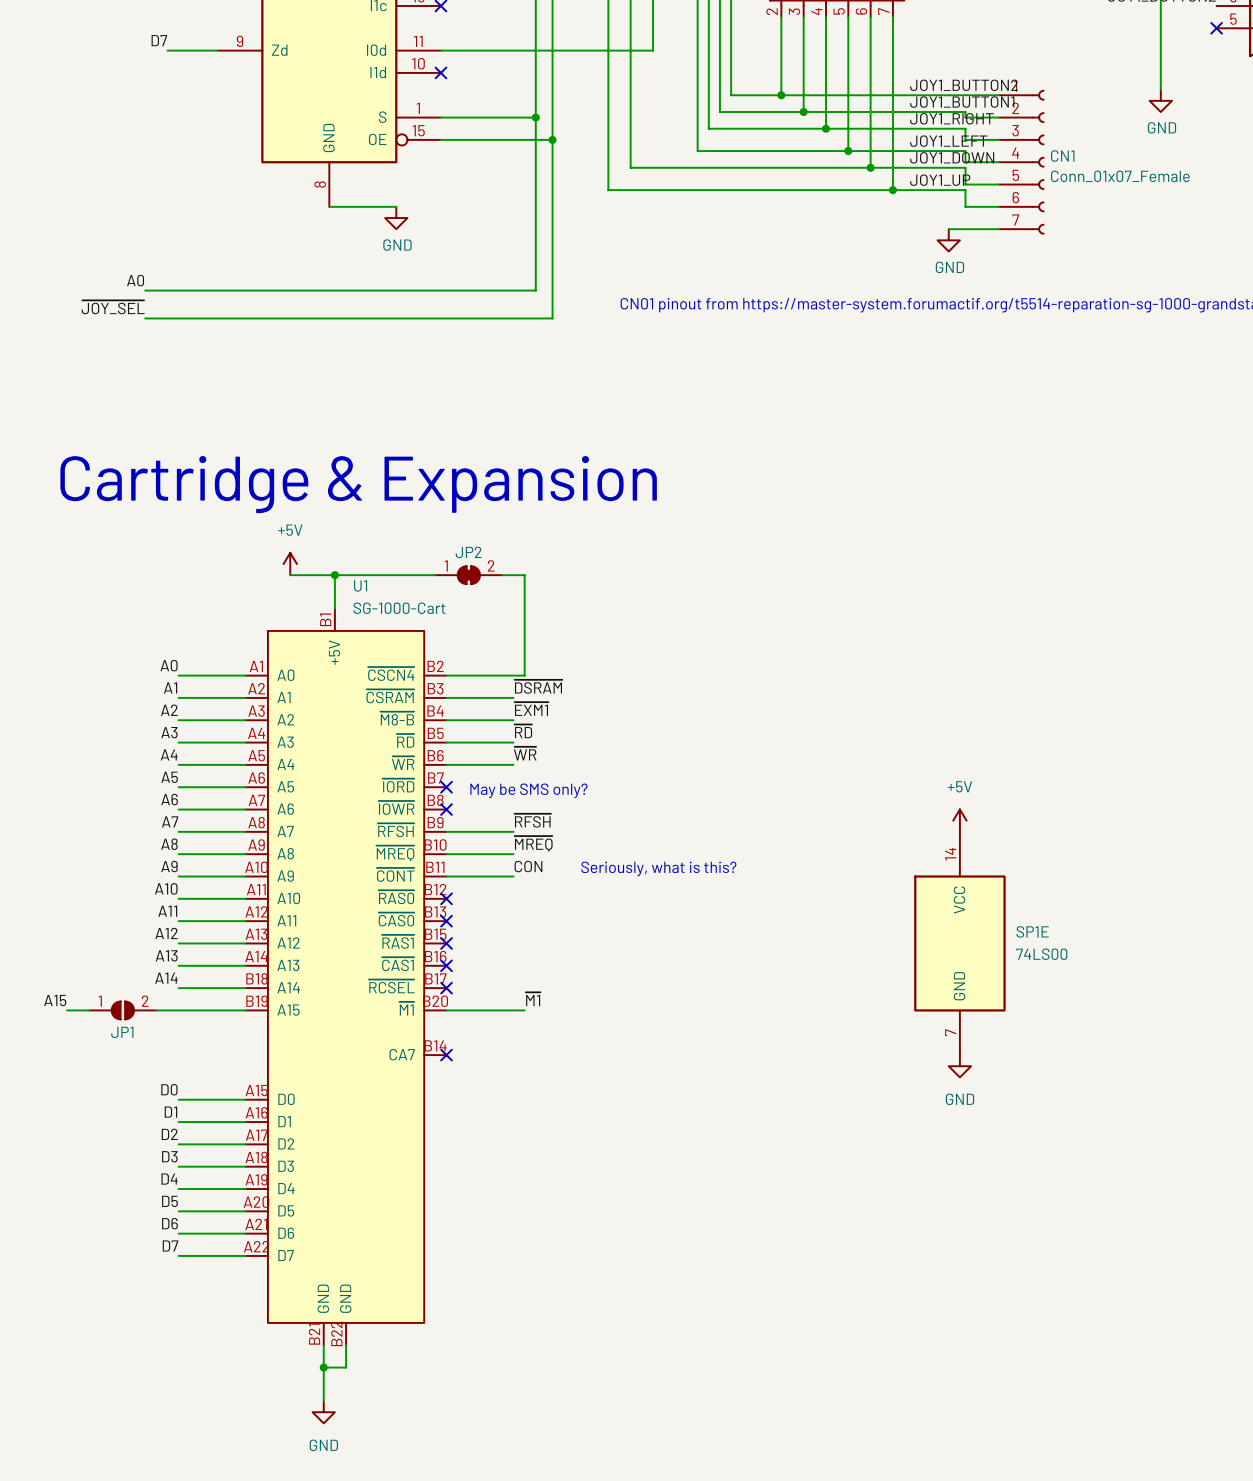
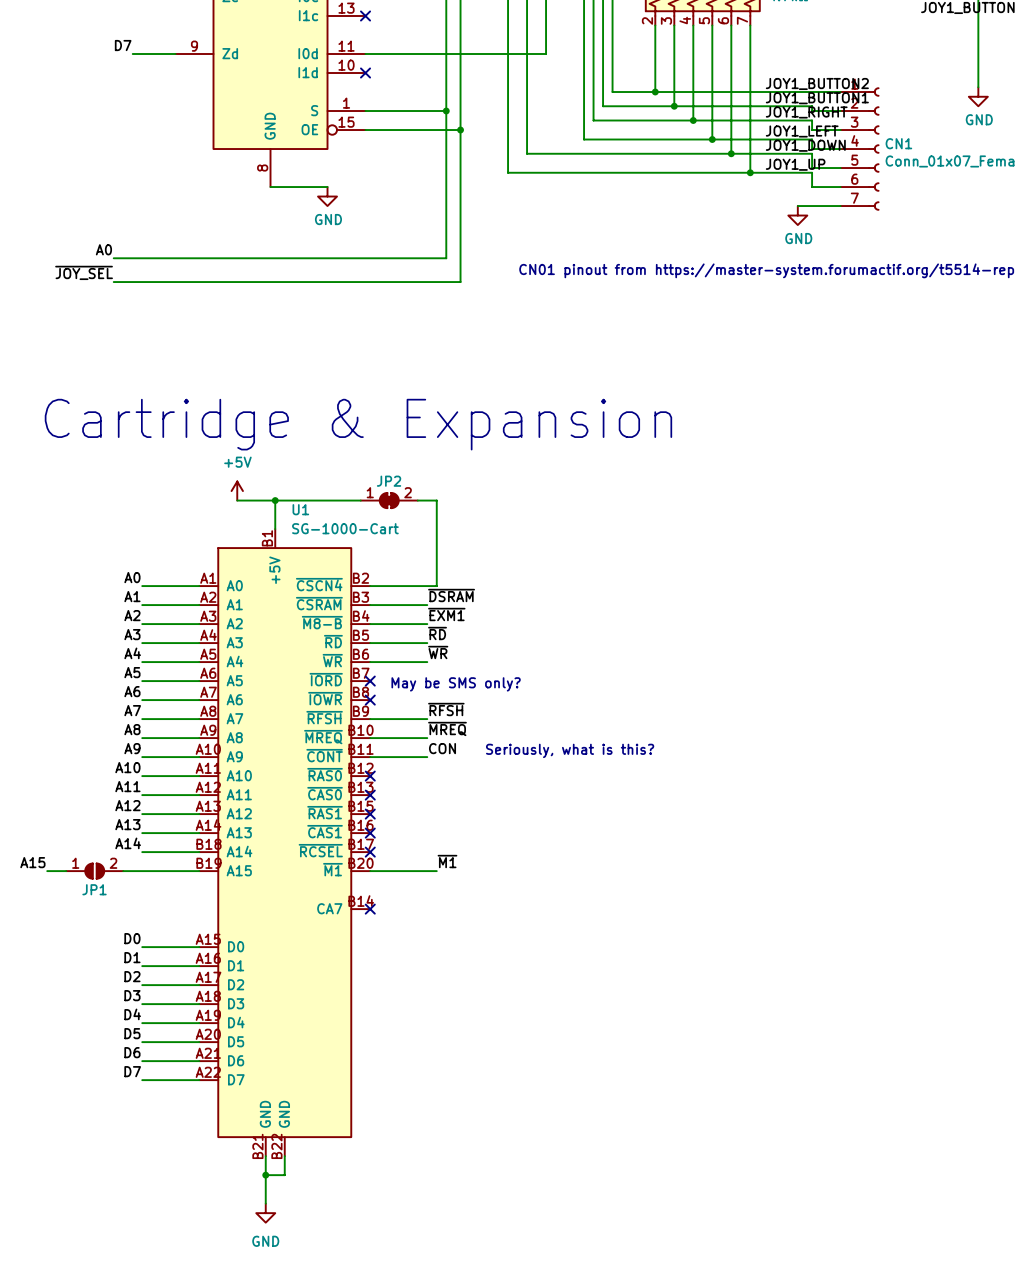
power symbol: +5V (959, 820) -> none
SP1E: 74LS00 (959, 943) -> none
power symbol: GND (959, 1066) -> none

